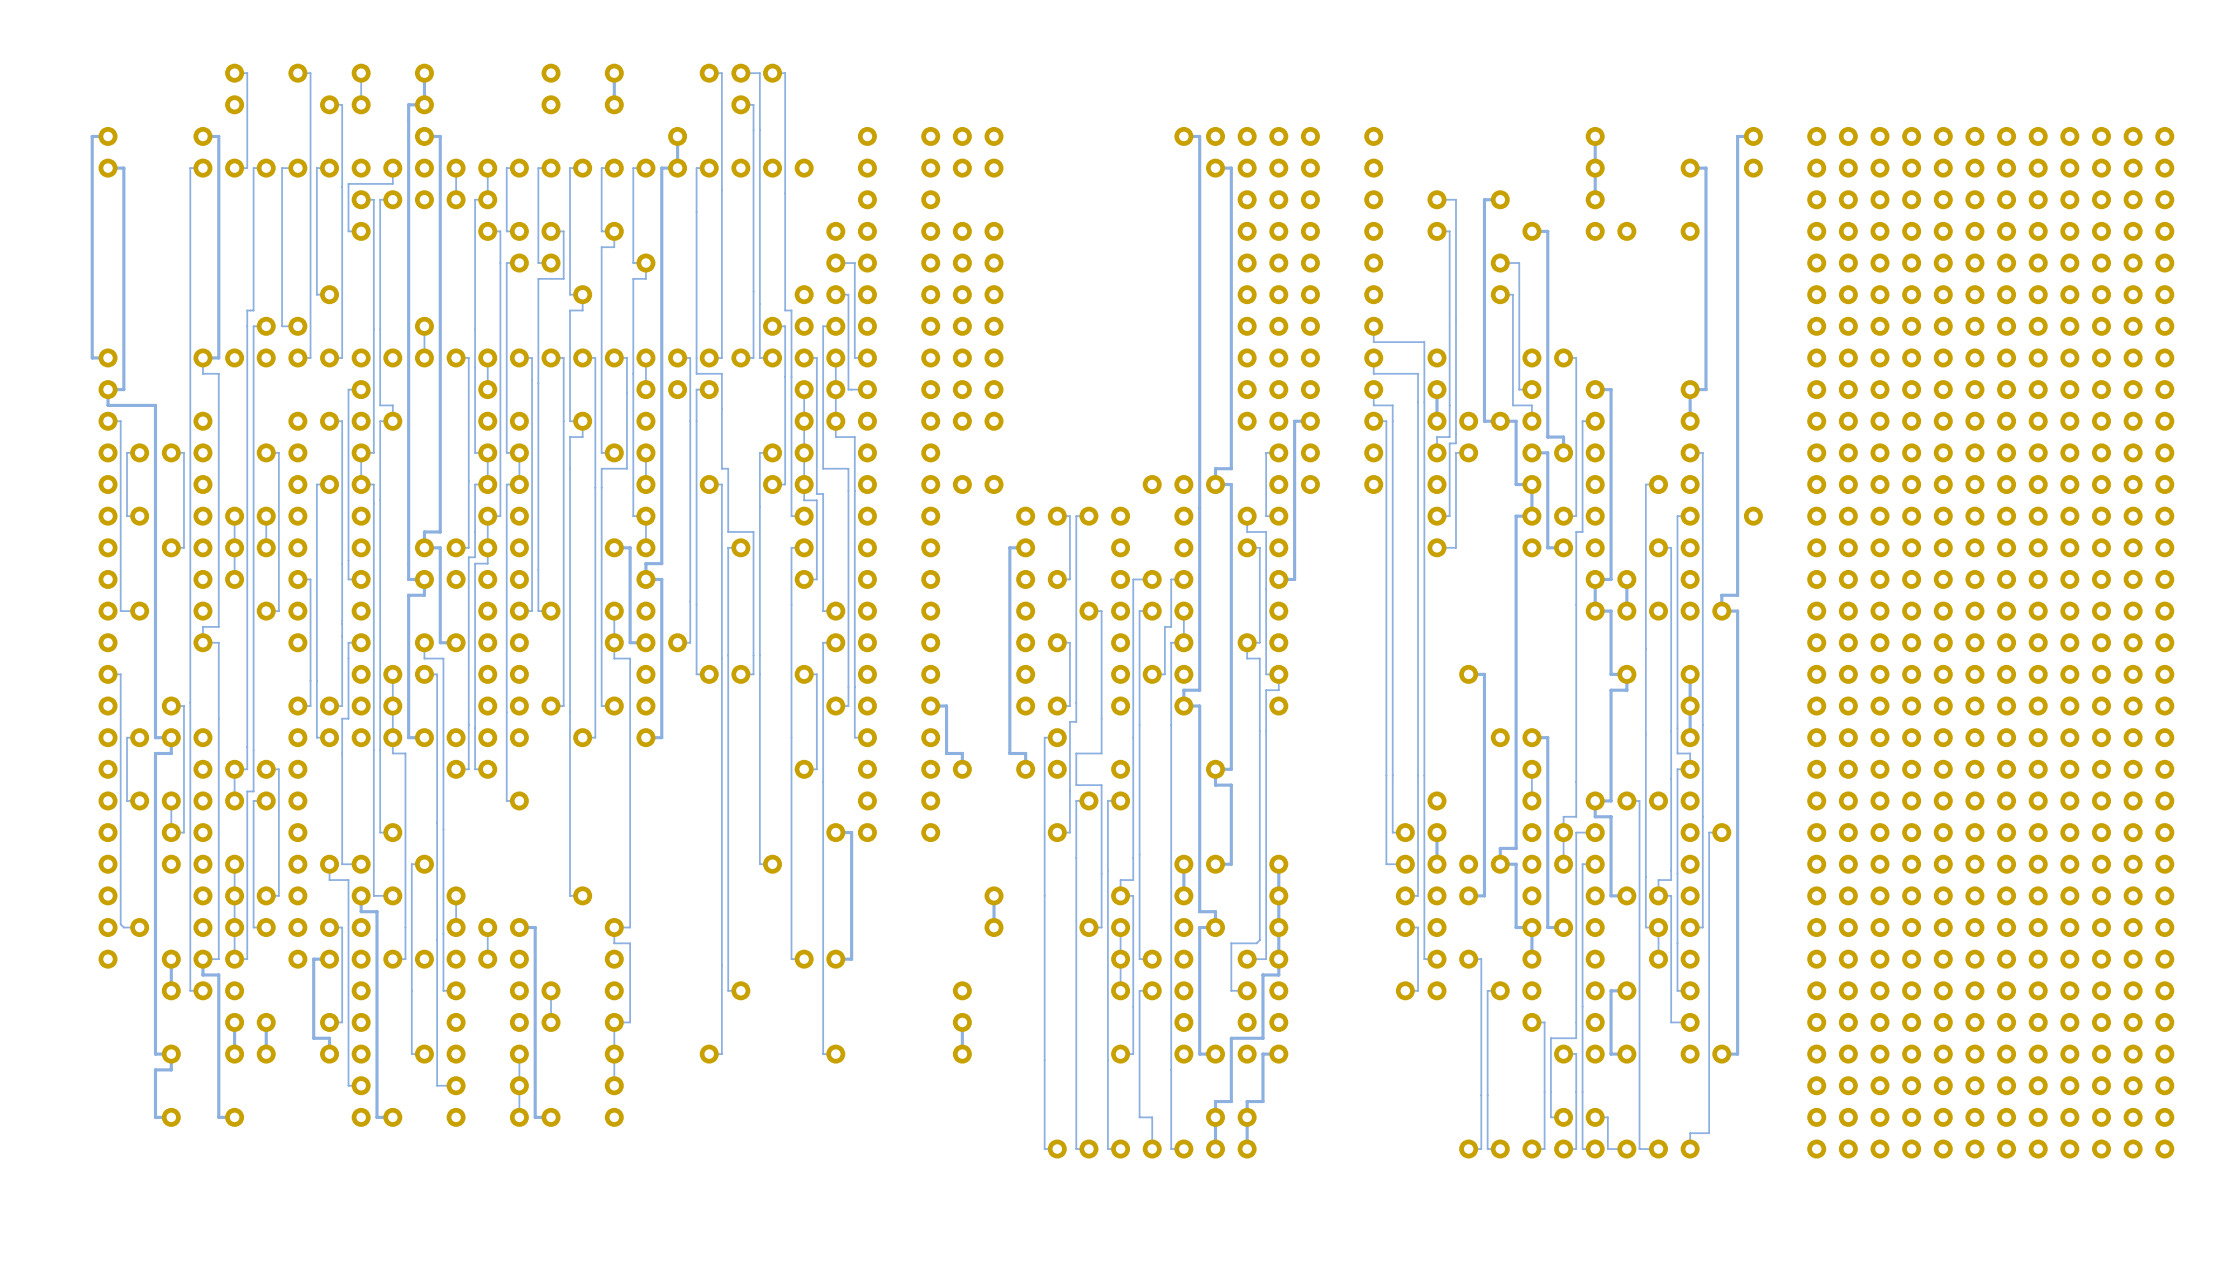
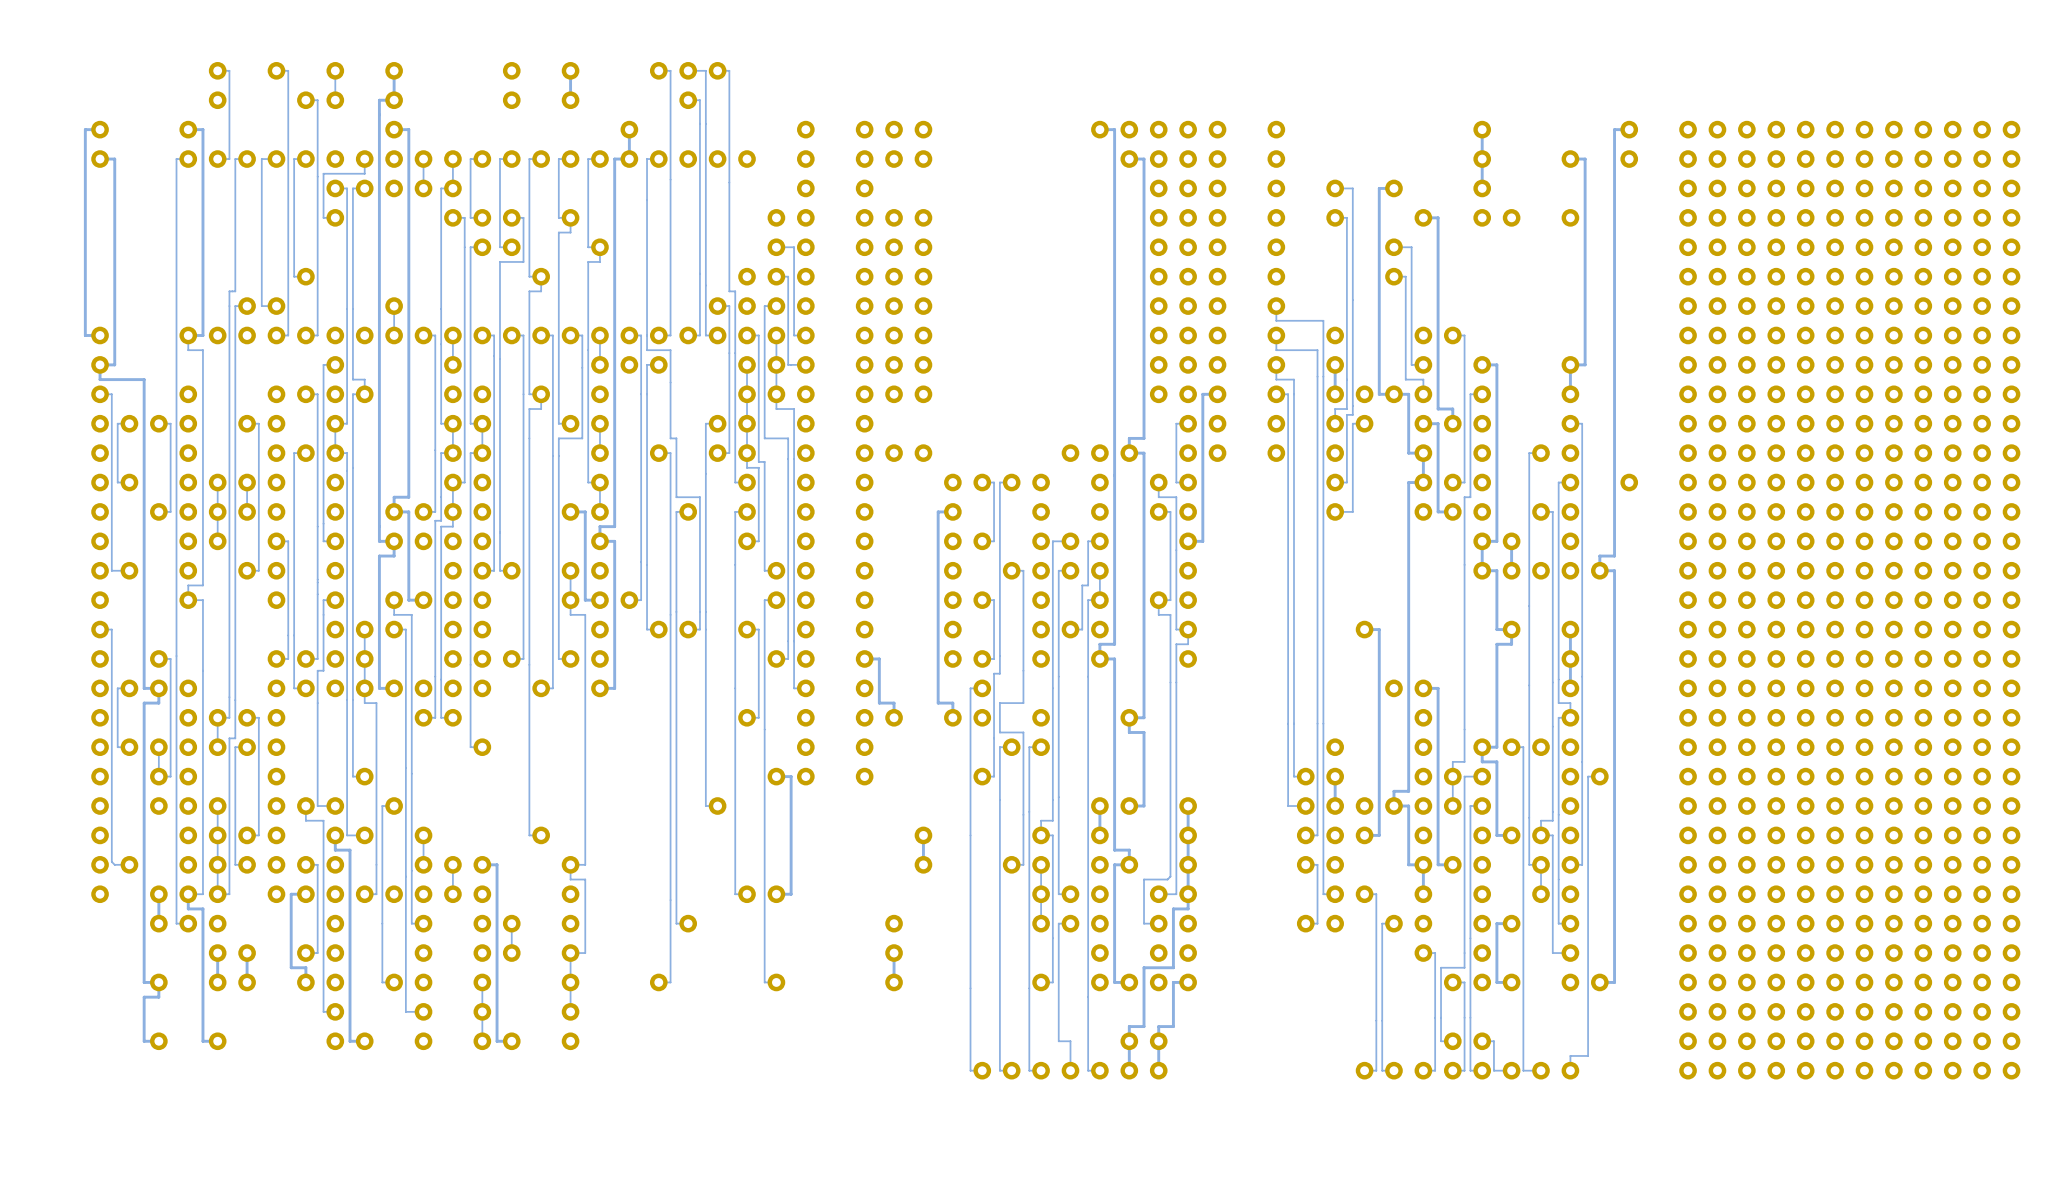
track: (1531, 769) (1531, 800) -> none

